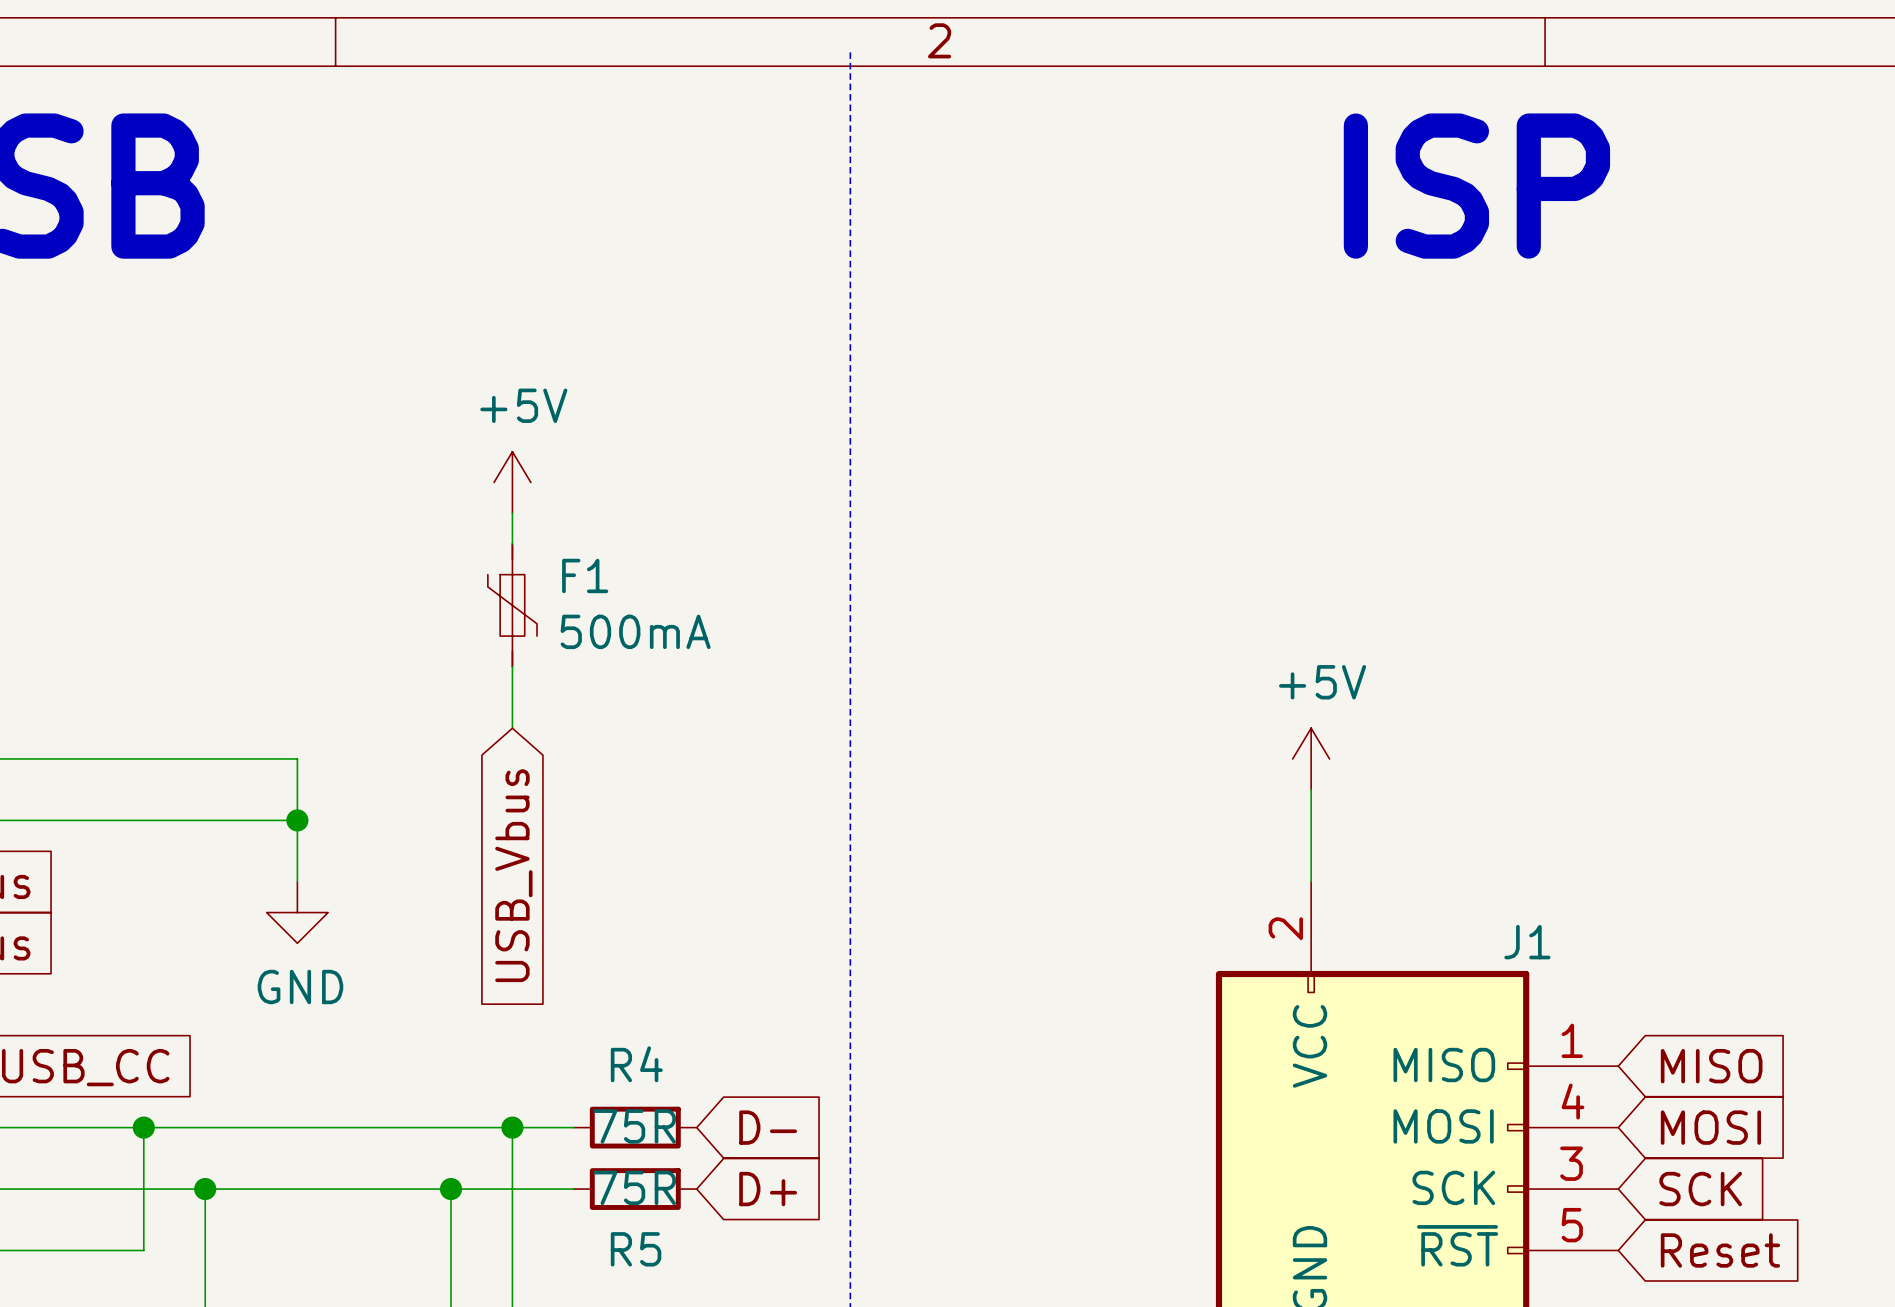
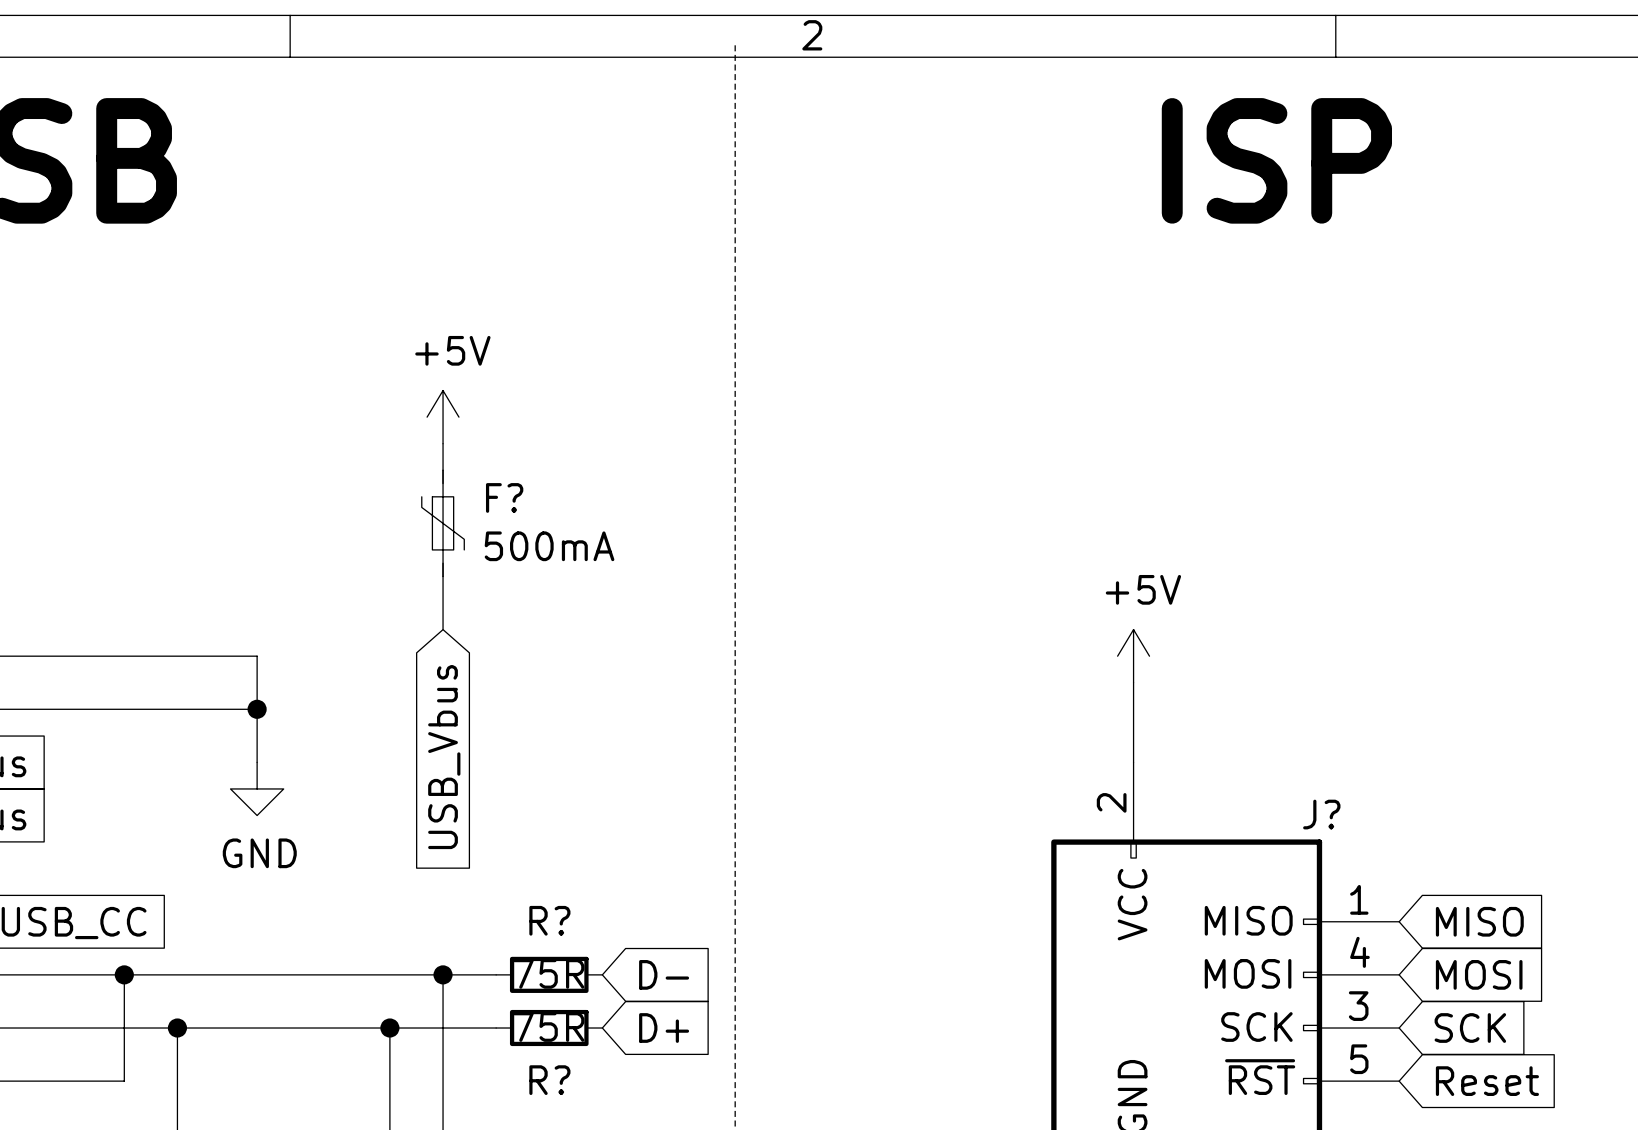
F1 name: F1 (585, 575) -> F? (504, 497)
J1 name: J1 (1527, 942) -> J? (1321, 814)
R4 name: R4 (636, 1064) -> R? (549, 920)
R5 name: R5 (636, 1249) -> R? (549, 1080)

